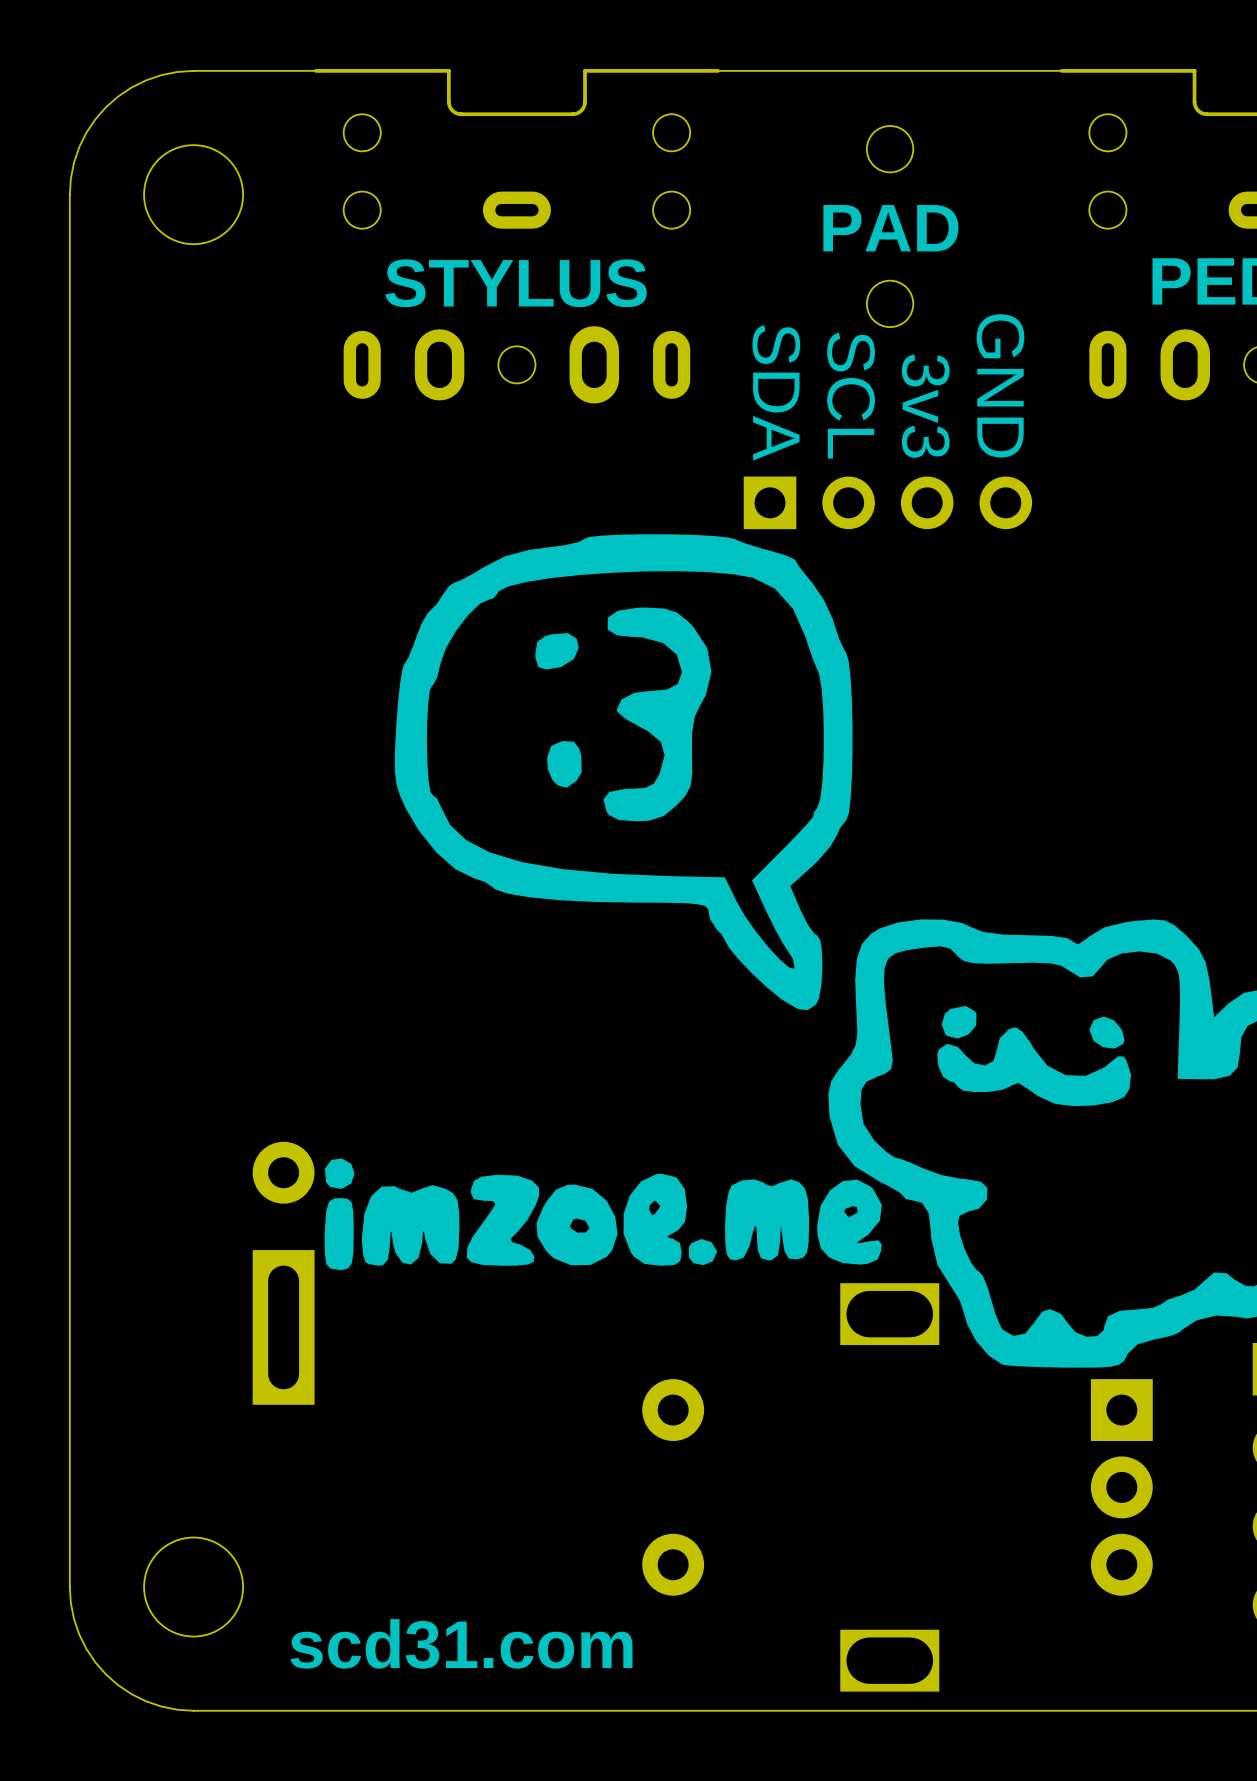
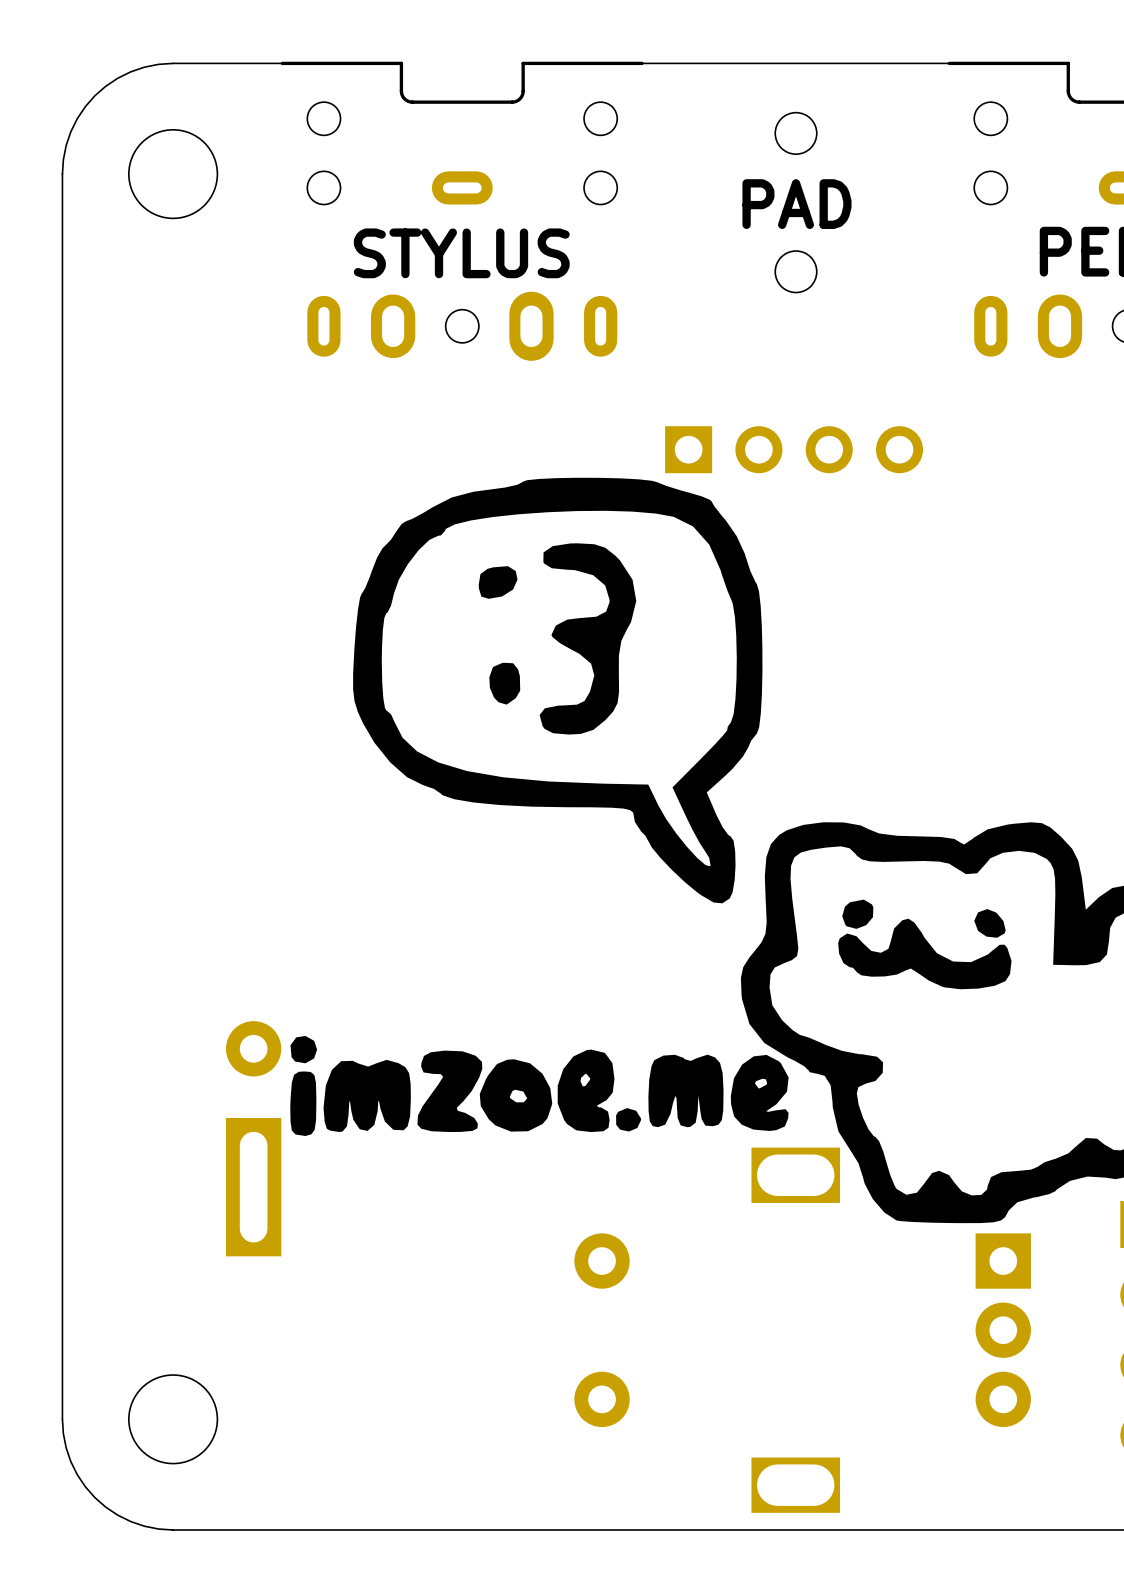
text: GND (1000, 385) -> none
text: SDA (776, 392) -> none
text: SCL (851, 395) -> none
text: 3v3 (925, 406) -> none
text: scd31.com (461, 1643) -> none

